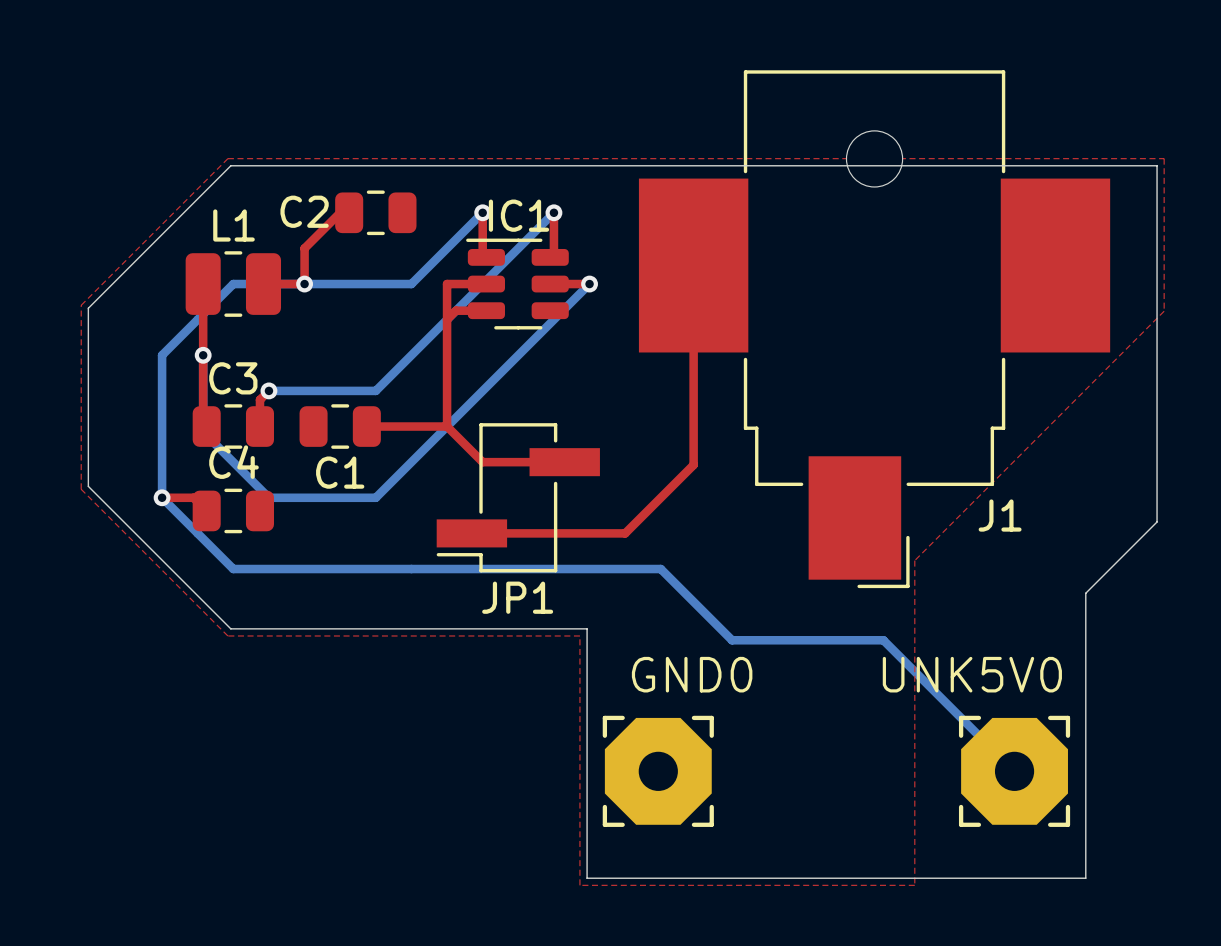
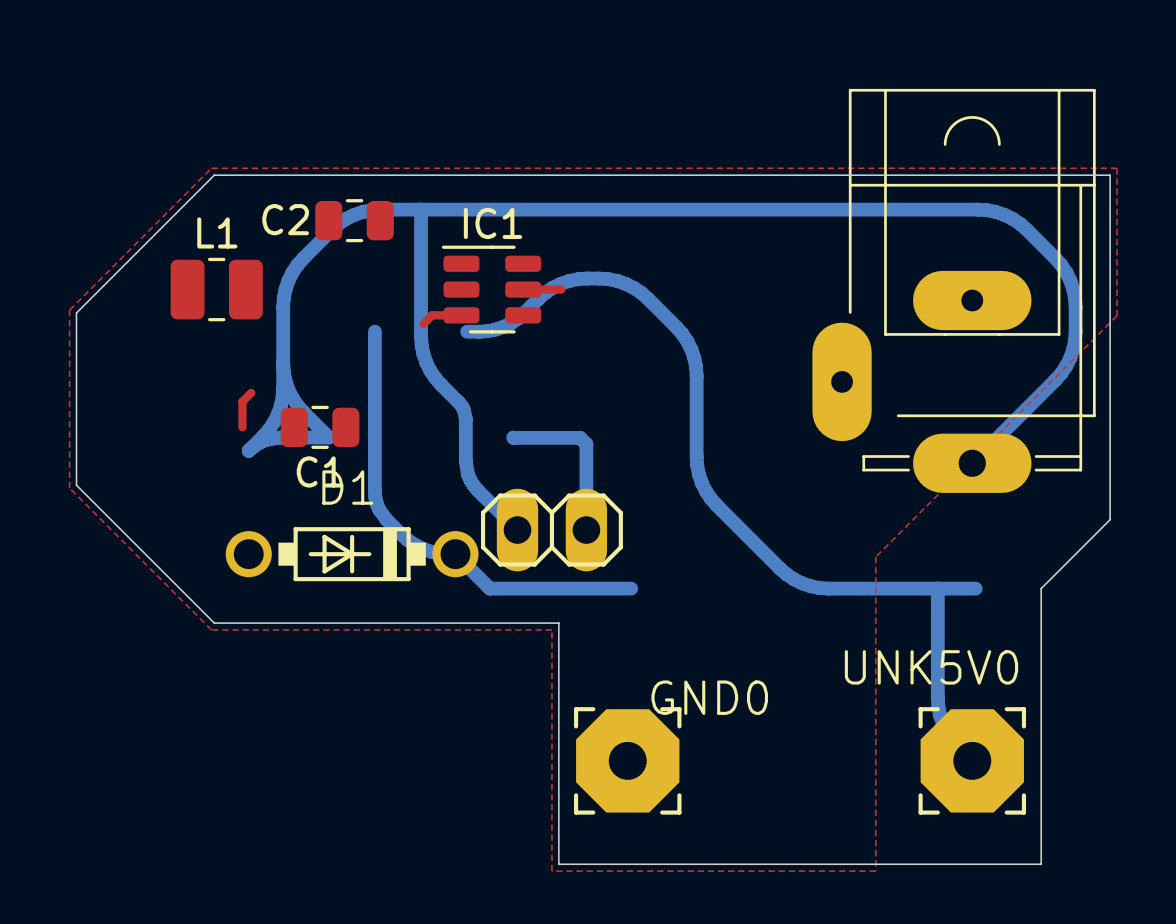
bottom track: none -> (421, 209) (421, 336) (423, 353) (435, 378) (464, 410) (465, 461) (470, 480) (478, 490) (517, 530)
top track: (349, 212) (340, 212) (304, 248) (304, 284) (263, 284) -> none
top track: (482, 212) (482, 253) (486, 257) -> none
bottom track: (482, 212) (411, 284) (233, 284) (162, 355) (162, 497) (233, 569) (660, 569) (732, 640) (883, 640) (999, 756) -> (937, 588) (938, 706) (943, 724) (958, 746)
via: (482, 212) -> none
top track: (553, 212) (553, 253) (550, 257) -> none
bottom track: (553, 212) (375, 390) (268, 390) -> none
via: (553, 212) -> none
top track: (693, 265) (693, 464) (625, 533) (471, 533) -> none
top track: (203, 284) (203, 423) (206, 426) -> none
via: (304, 284) -> none
top track: (486, 284) (447, 284) (447, 426) -> none
bottom track: (589, 284) (375, 497) (268, 497) (203, 432) (203, 355) -> none
via: (589, 284) -> none
part: none -> (954, 290)
bottom track: none -> (374, 331) (374, 491) (376, 503) (386, 519) (415, 544) (431, 551) (455, 554) (489, 588) (631, 588)
bottom track: none -> (467, 331) (487, 331) (511, 323) (545, 292) (569, 280) (587, 278) (608, 279) (633, 287) (647, 298) (676, 327) (691, 349) (696, 375) (697, 465) (705, 491) (716, 505) (779, 568) (802, 583) (819, 588) (975, 588)
J1: (874, 329) -> none
via: (203, 355) -> none
bottom track: none -> (283, 363) (283, 372) (285, 381) (292, 397) (303, 412) (328, 437) (280, 437) (266, 439) (248, 450) (268, 429) (280, 405) (283, 387) (283, 307) (288, 280) (297, 265) (331, 229) (346, 218) (362, 211) (380, 209) (987, 210) (1004, 214) (1020, 223) (1061, 265) (1073, 289) (1075, 331) (1070, 357) (1061, 373) (972, 463)
via: (268, 390) -> none
C3: (233, 426) -> none
top track: (366, 426) (447, 426) -> none
top track: (447, 426) (482, 462) (564, 462) -> none
bottom track: none -> (513, 437) (580, 437) (586, 444) (586, 530)
top track: (162, 497) (193, 497) (206, 510) -> none
via: (162, 497) -> none
JP1: (518, 497) -> none
C4: (233, 510) -> none
part: none -> (551, 530)
D1: none -> (352, 554)
GND0 name position: GND0 (692, 674) -> GND0 (709, 697)

